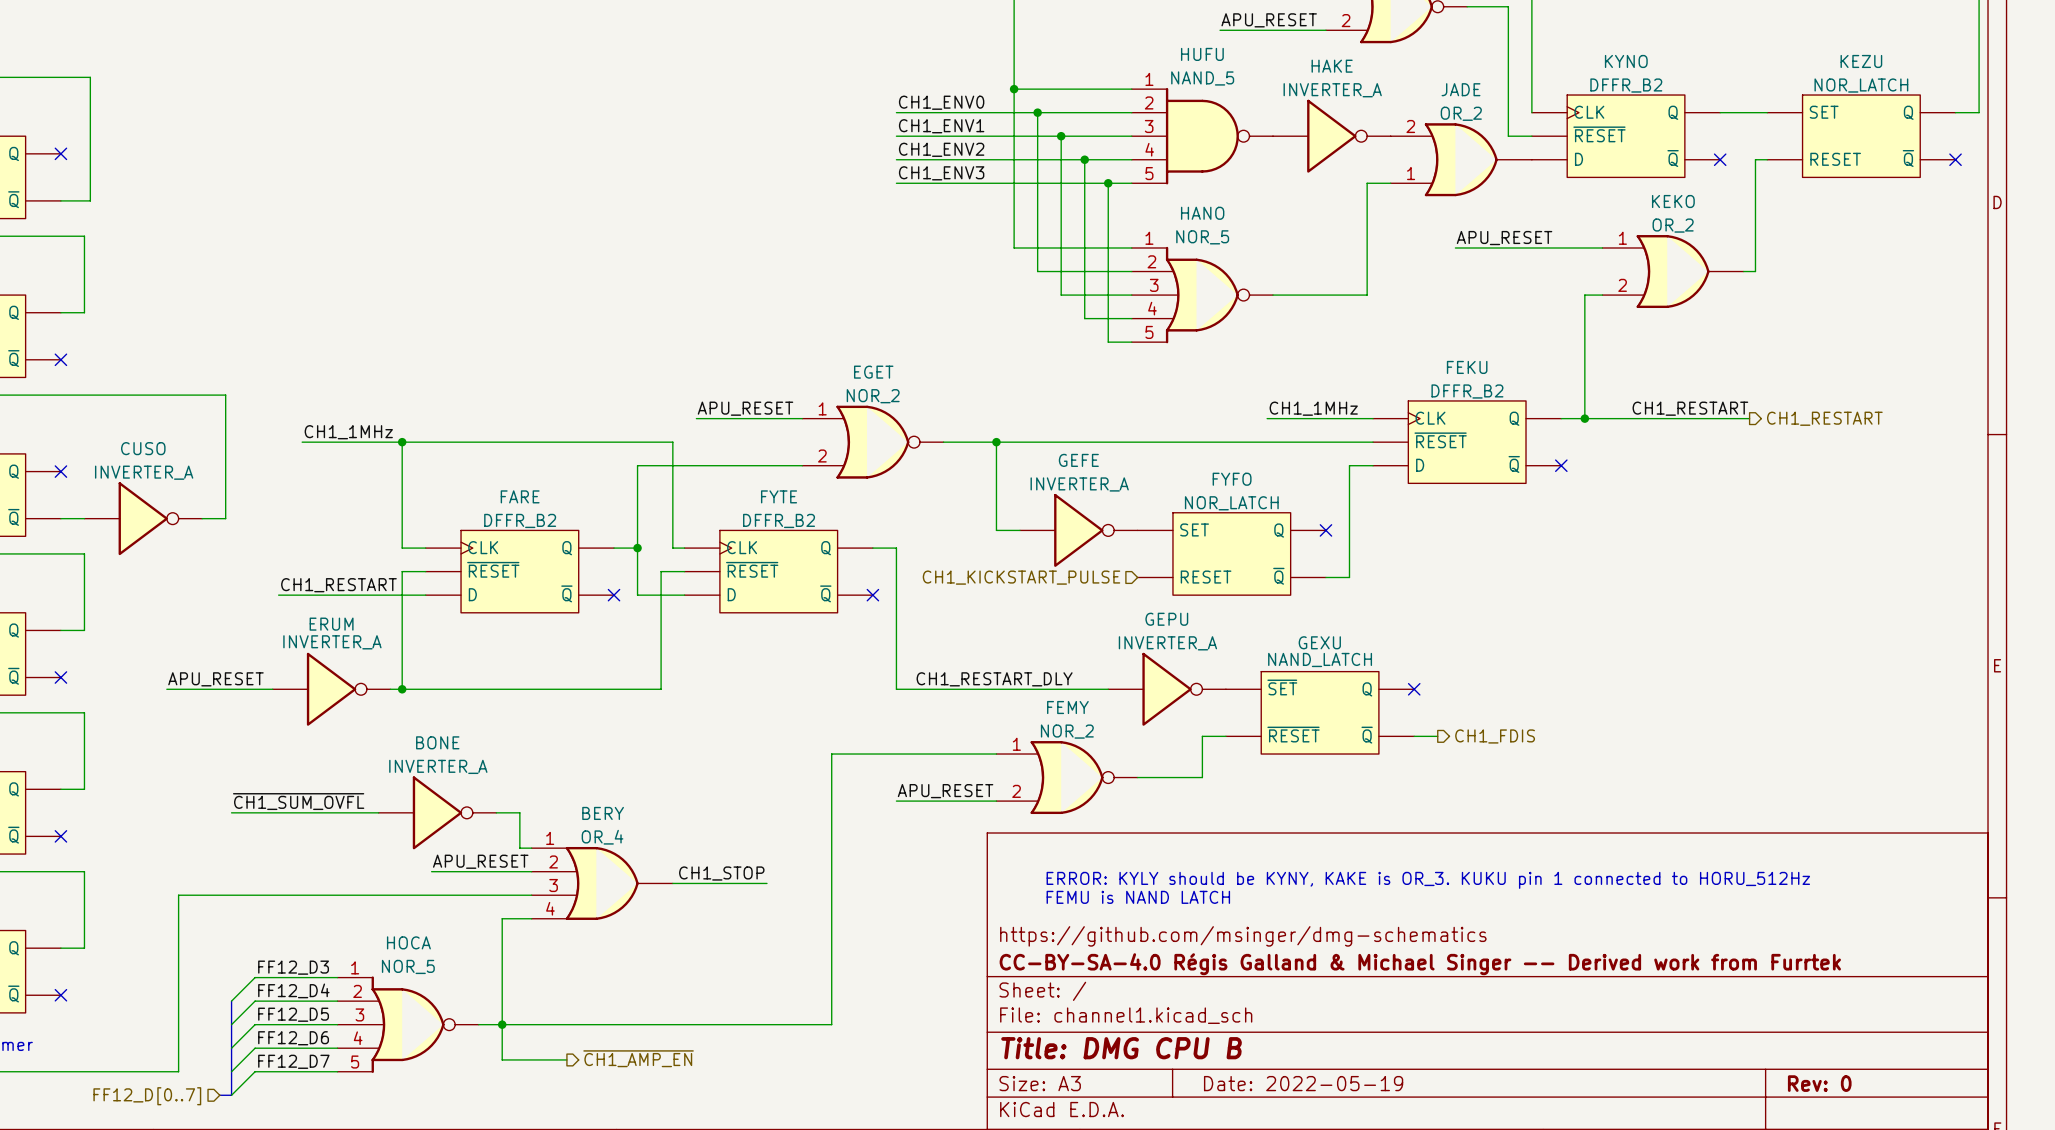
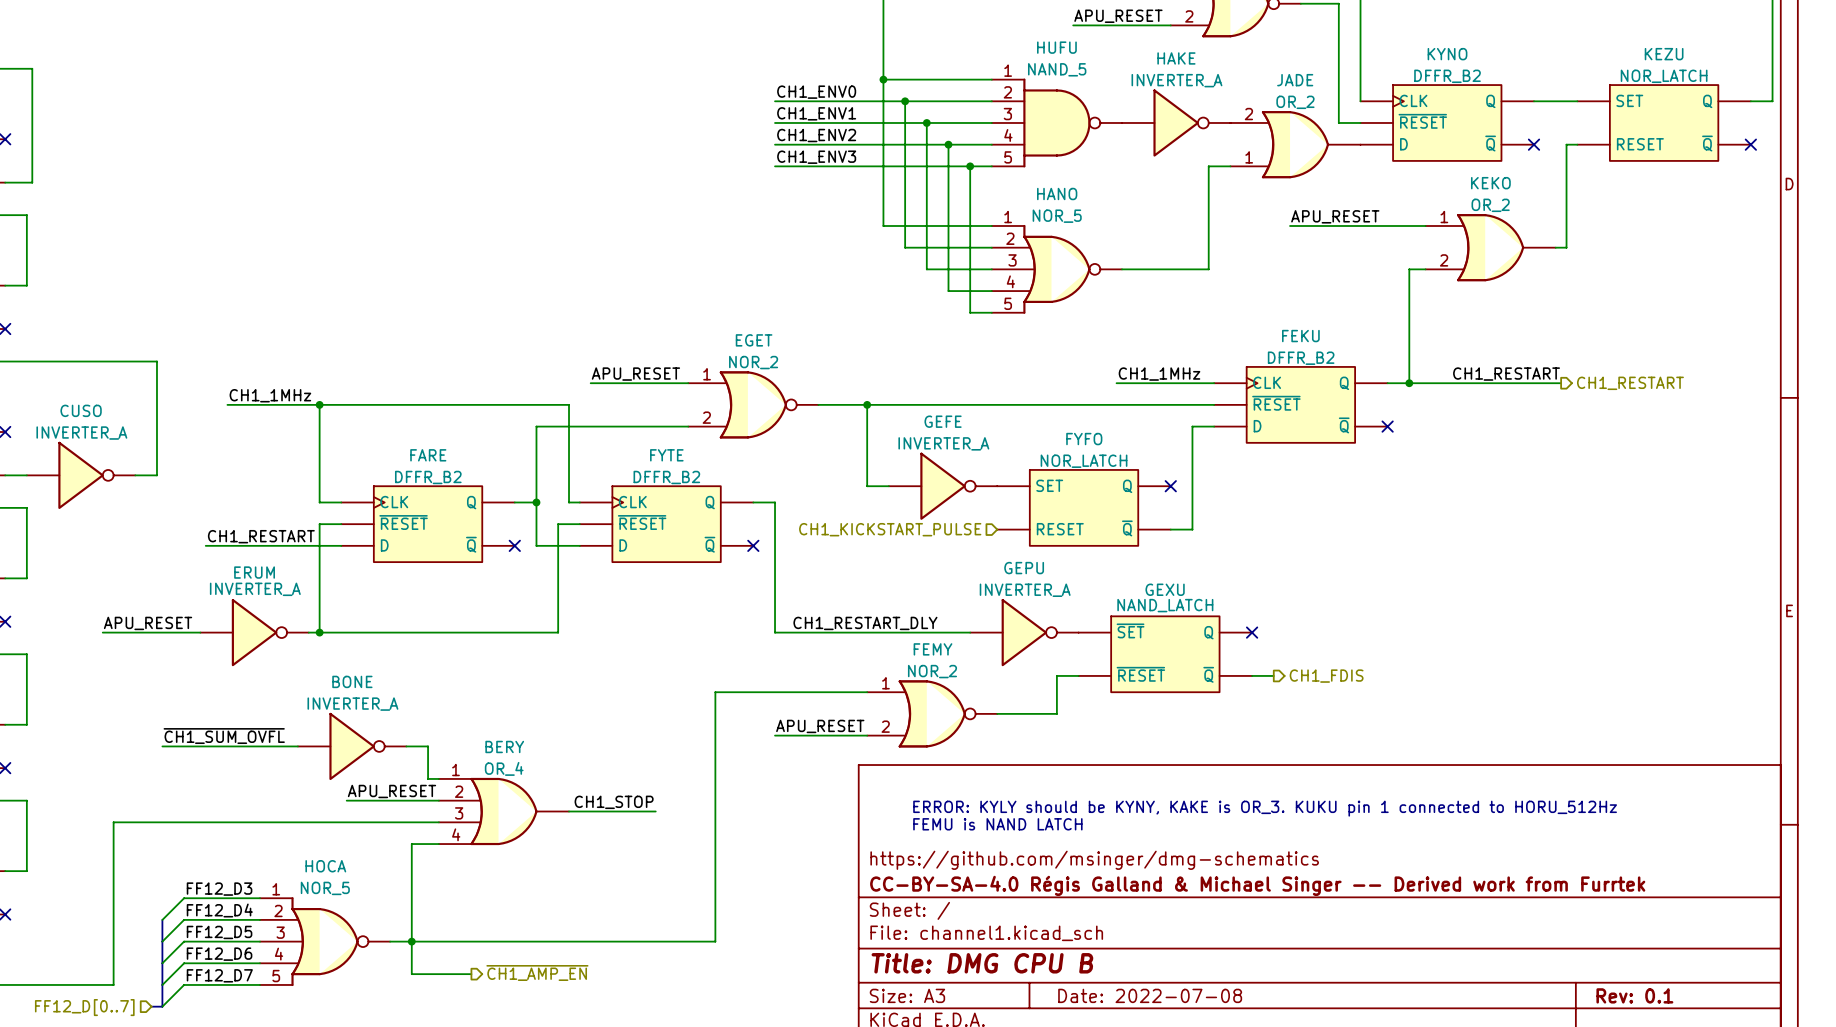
title block: Date: 2022-05-19 (1303, 1083) -> Date: 2022-07-08 (1150, 995)
title block: Rev: 0 (1819, 1083) -> Rev: 0.1 (1634, 995)

